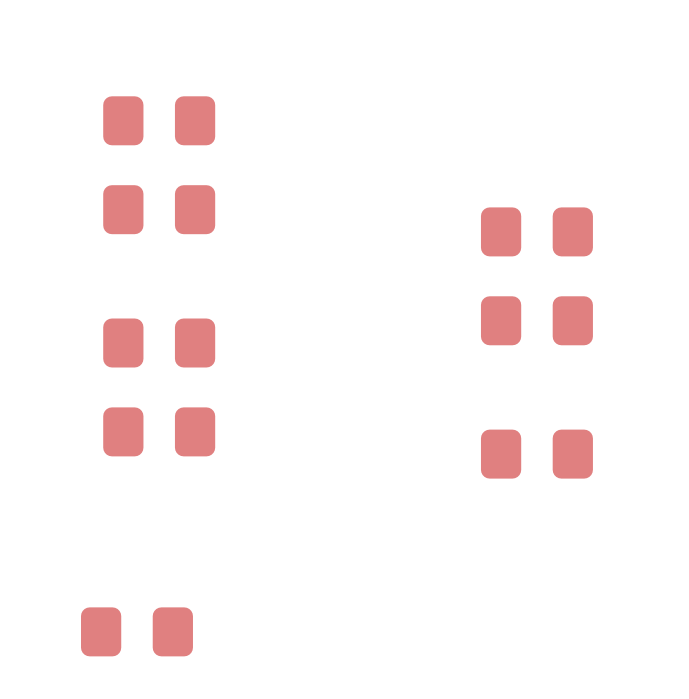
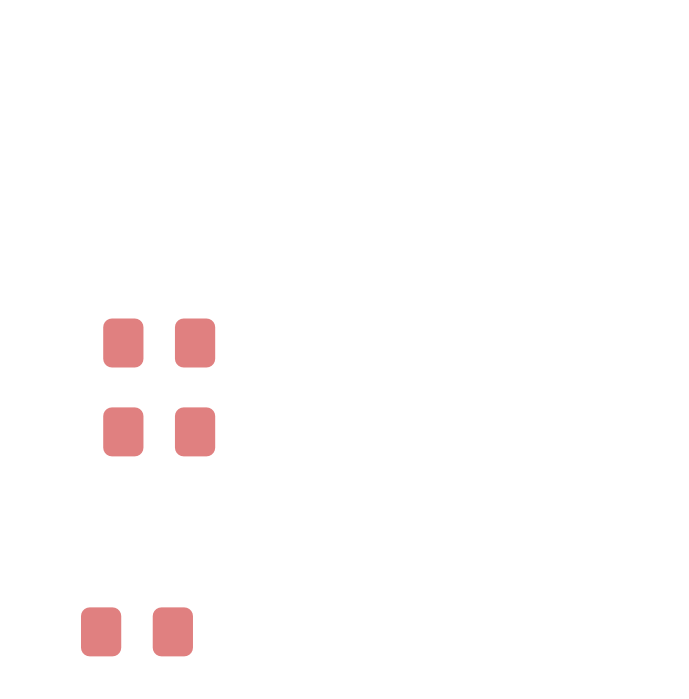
part: (159, 120) -> none
part: (159, 209) -> none
part: (536, 231) -> none
part: (536, 320) -> none
part: (536, 454) -> none

